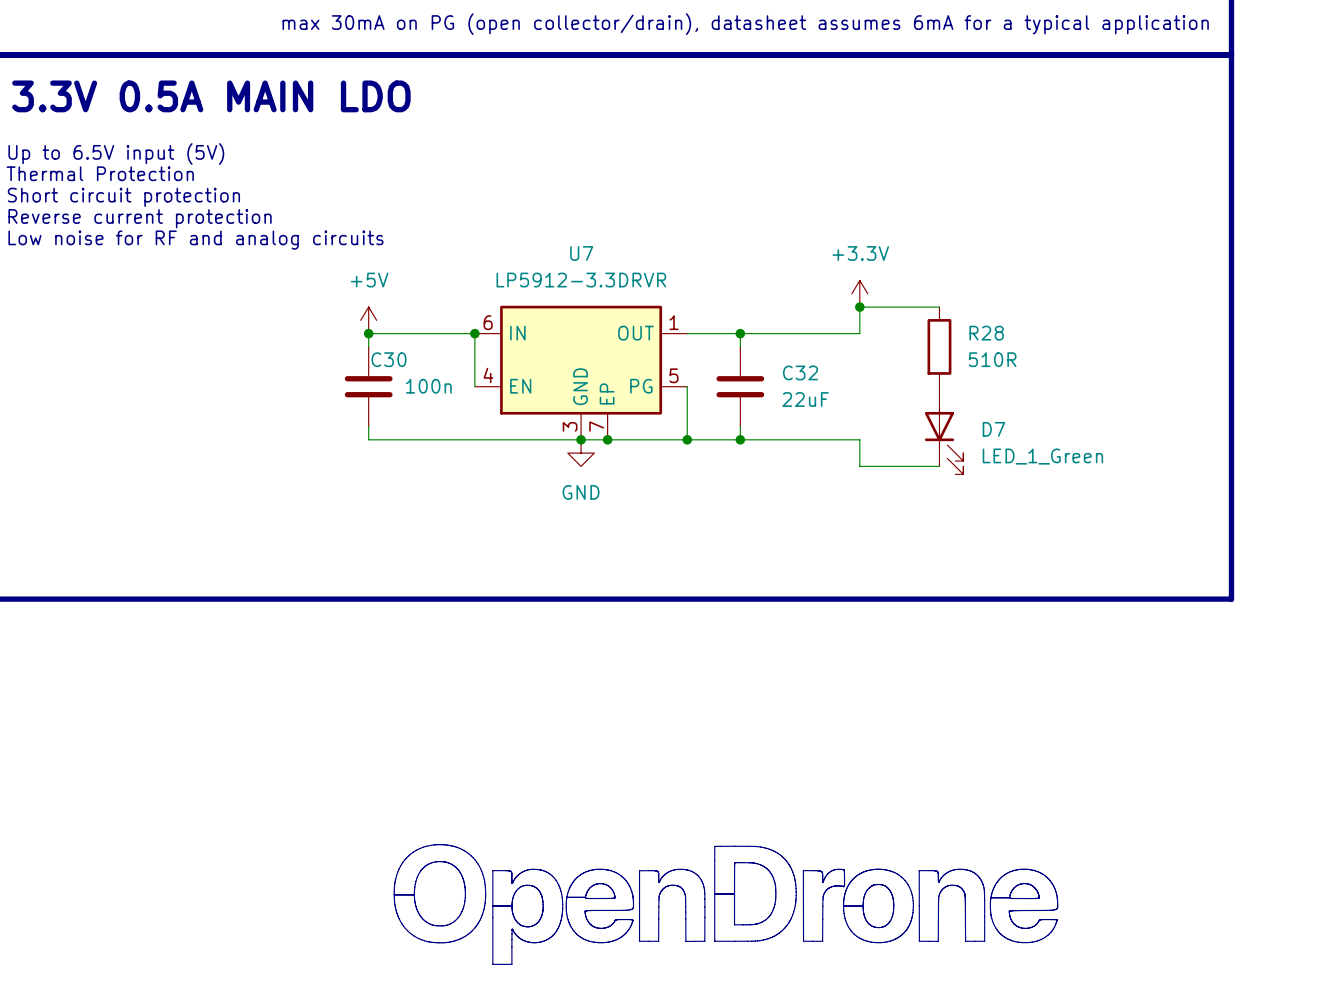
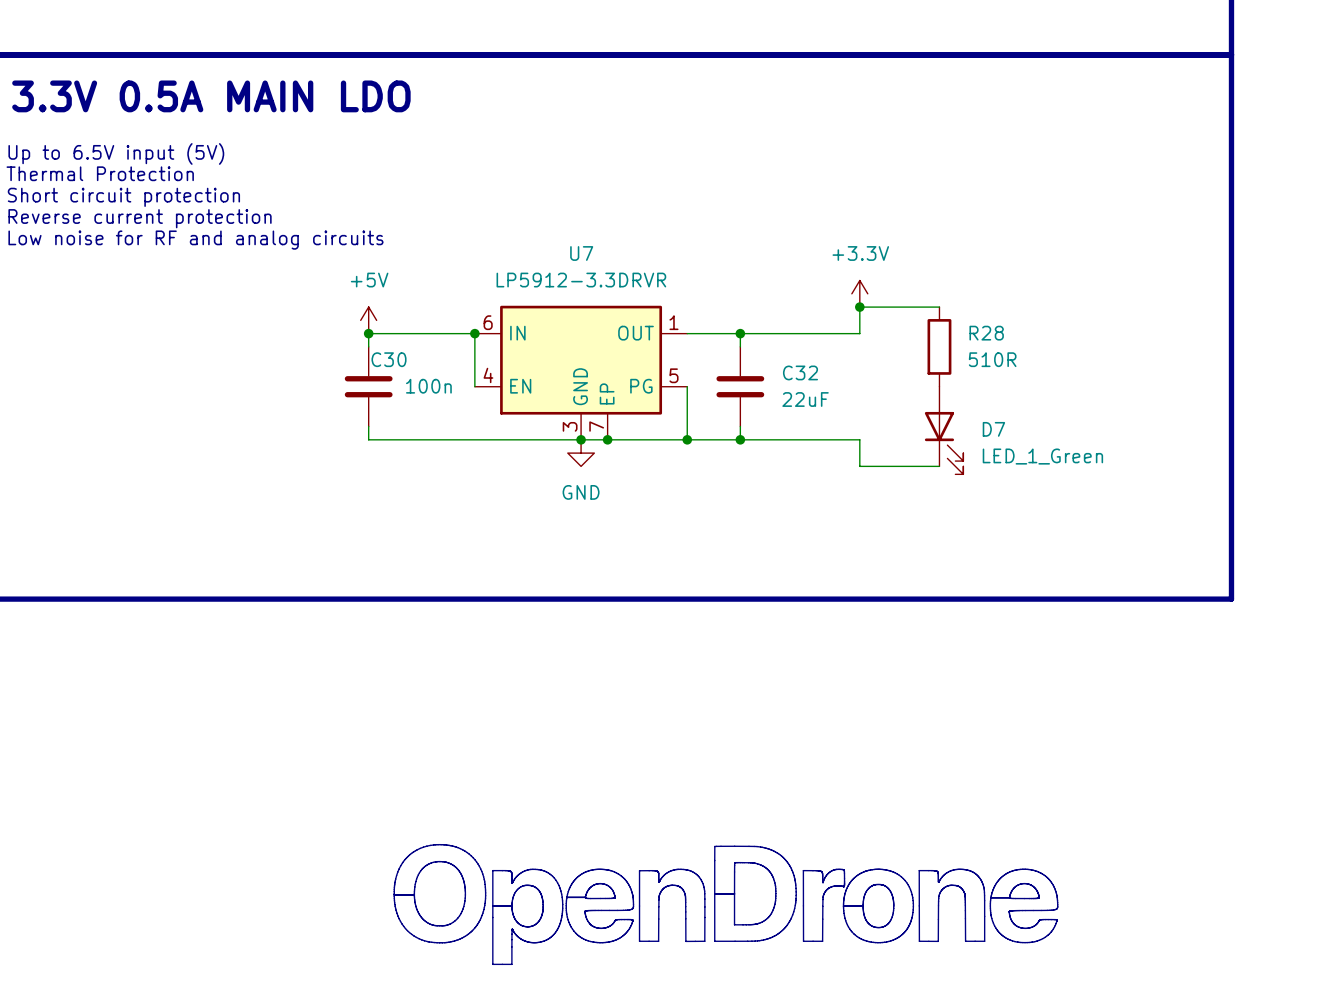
text: max 30mA on PG (open collector/drain), datasheet assumes 6mA for a typical application (745, 24) -> none

